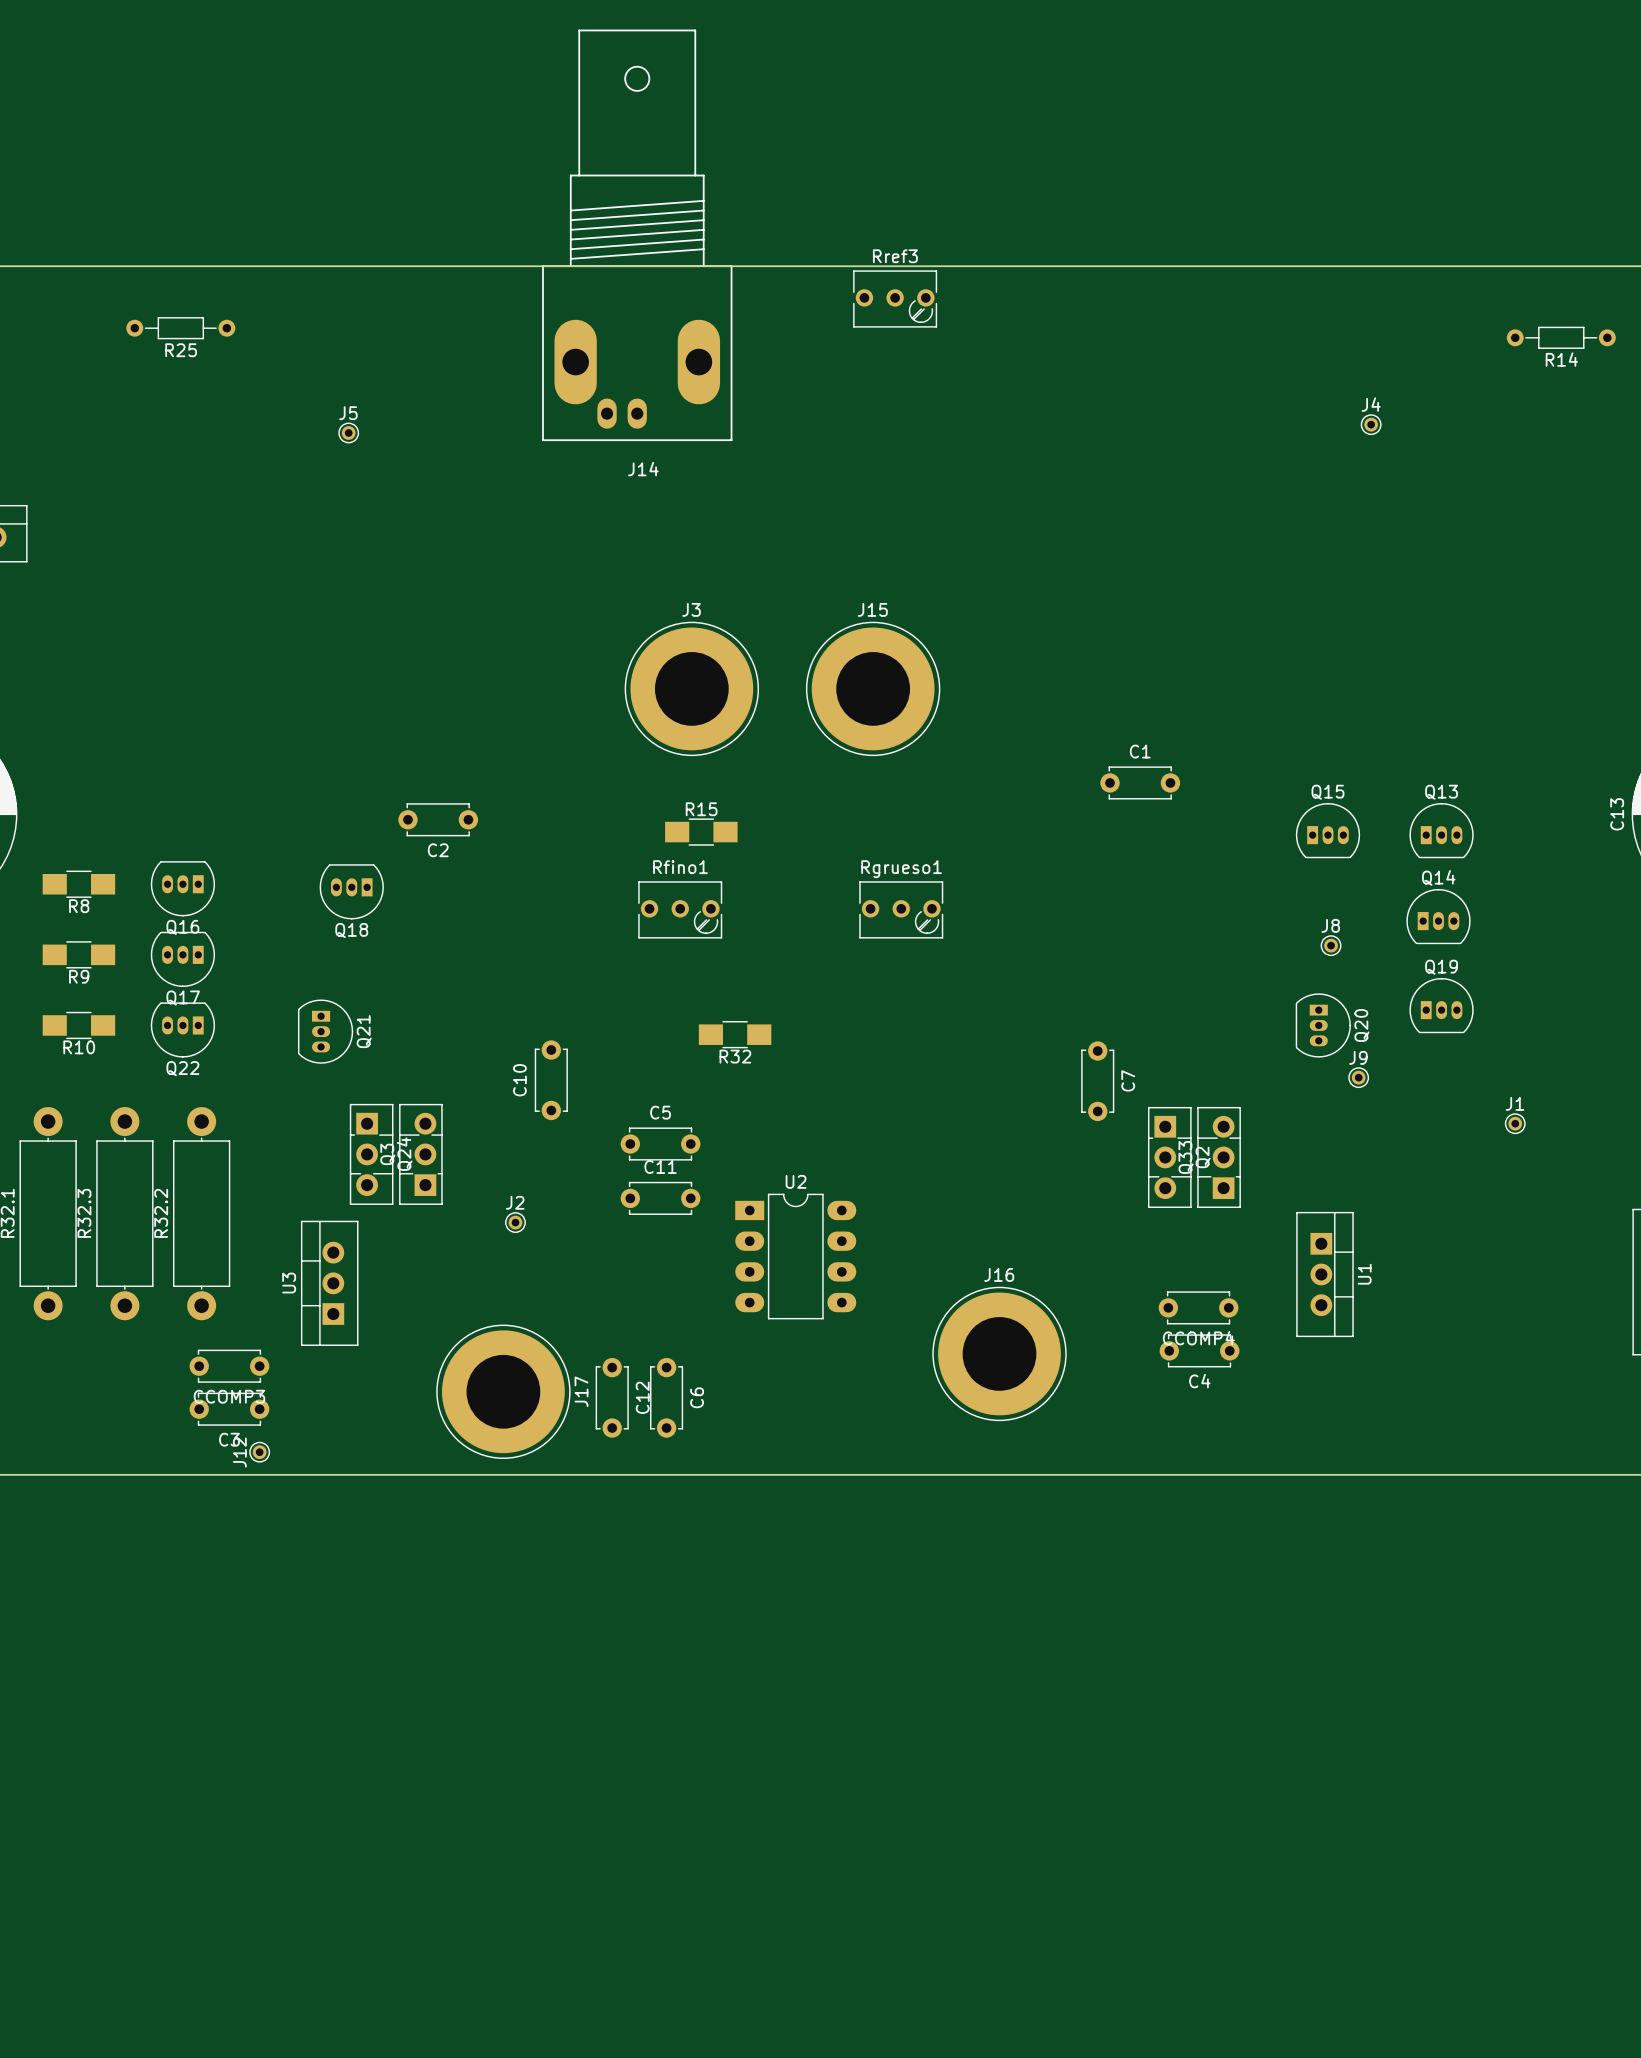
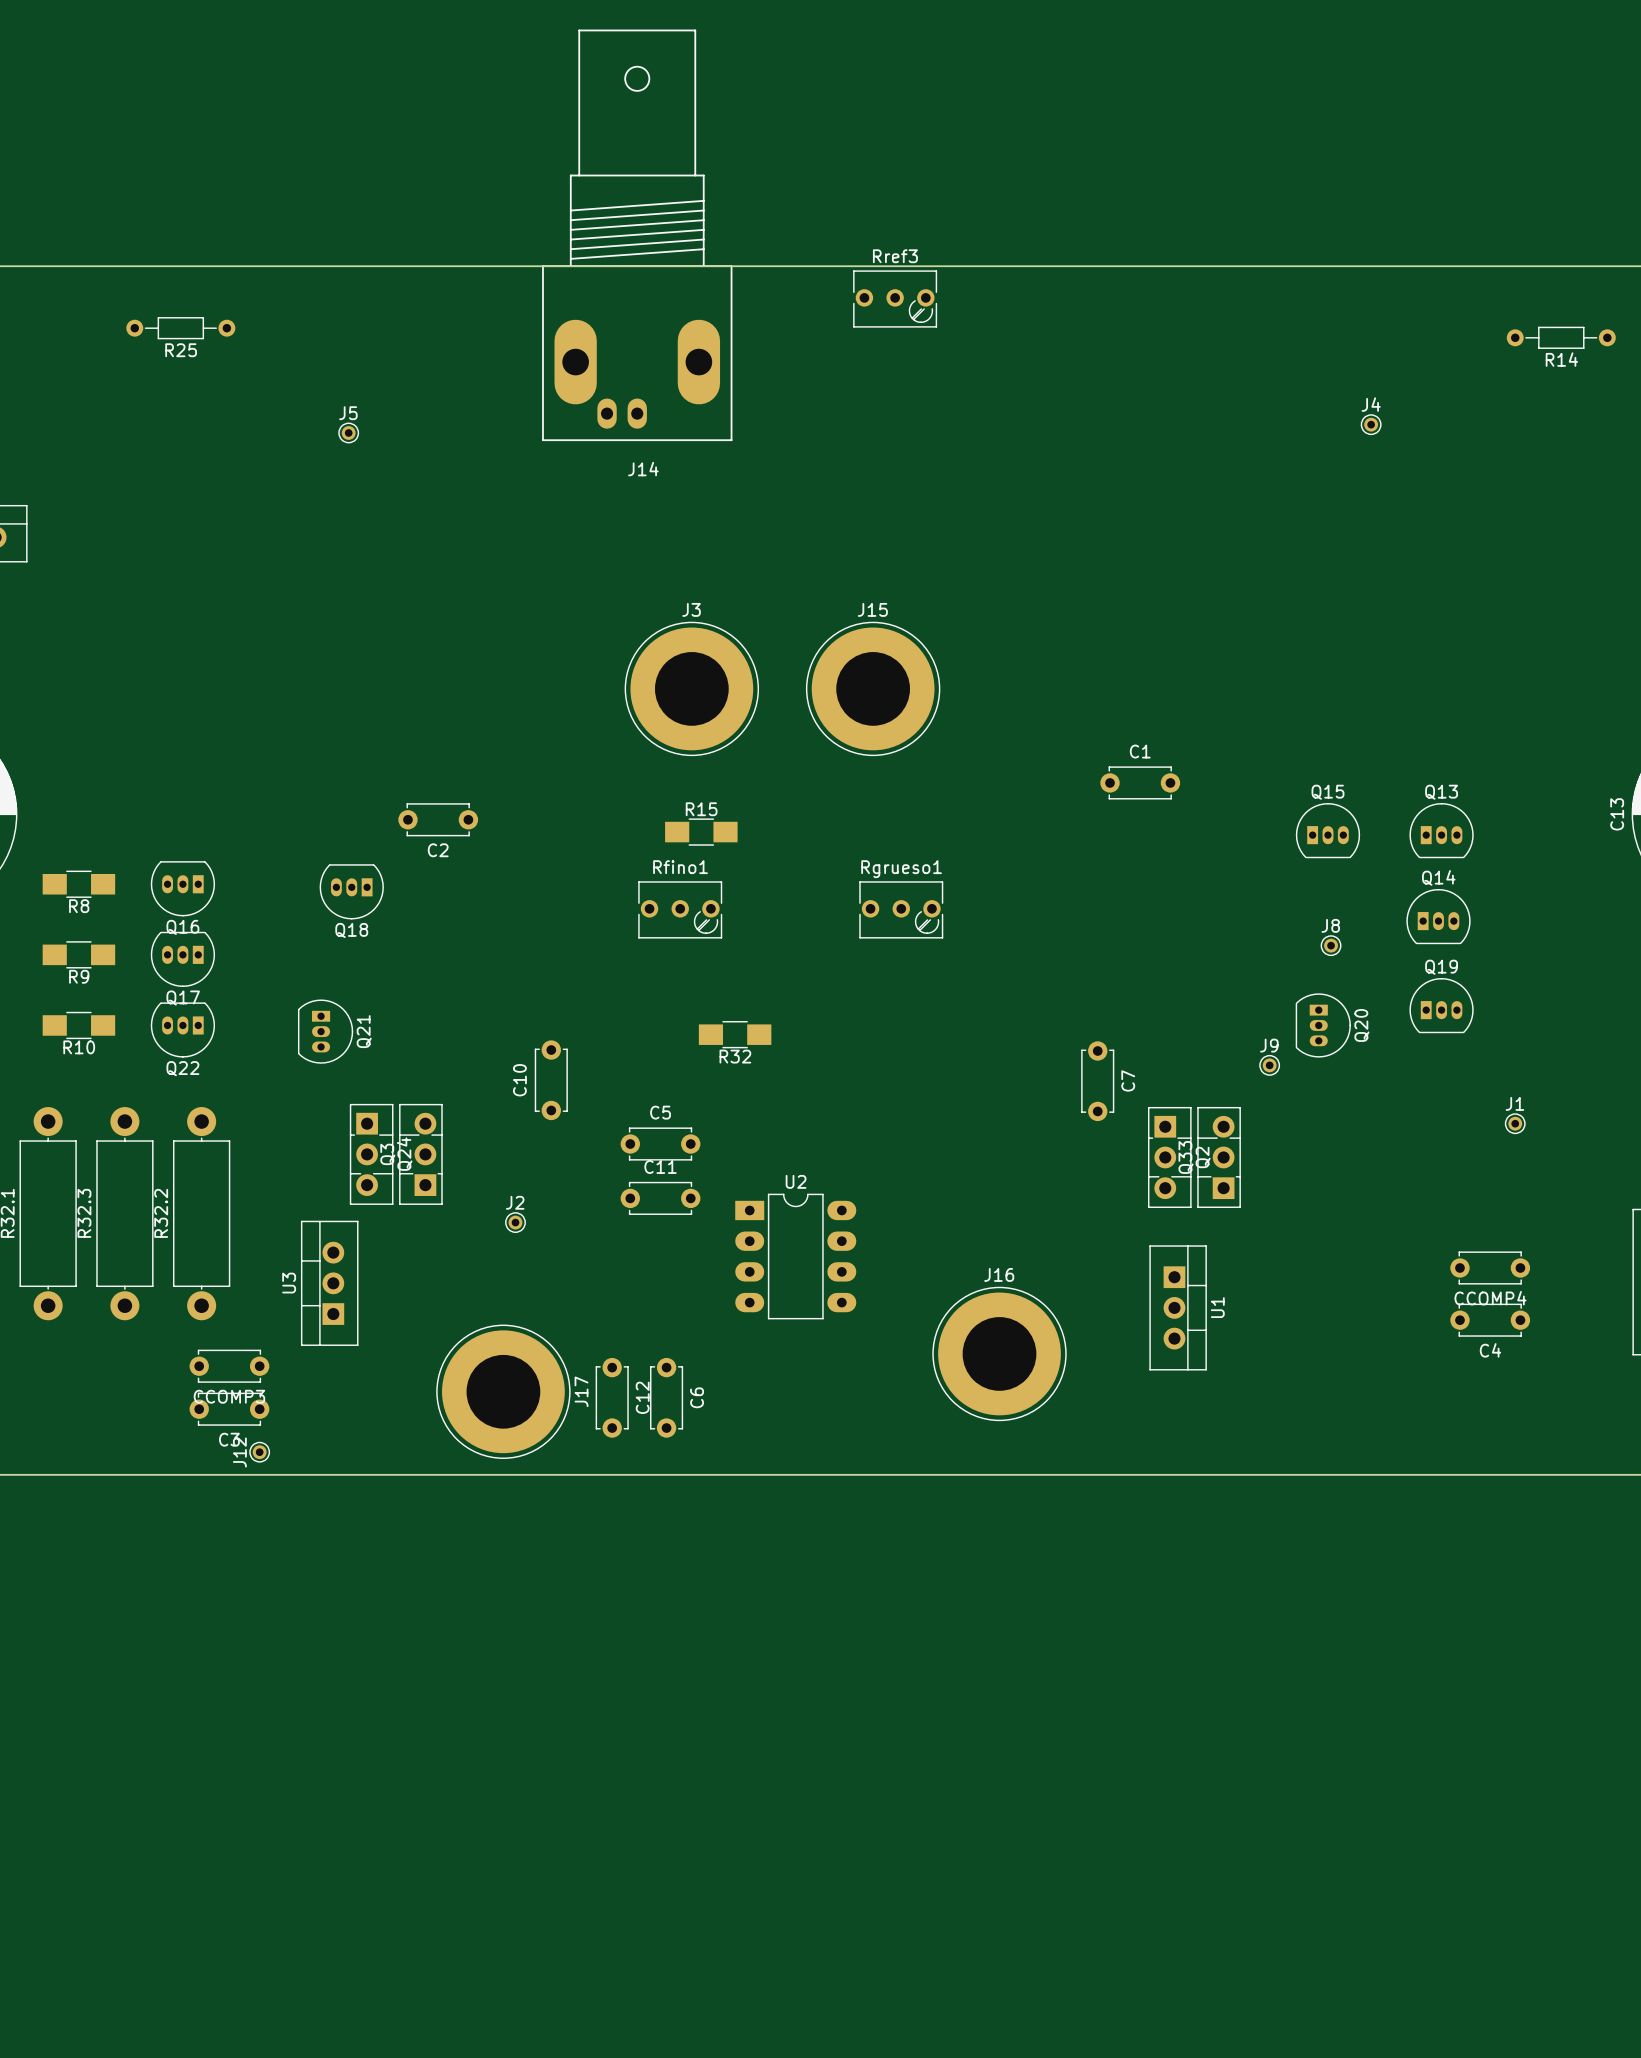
J9 position: (1358, 1077) -> (1269, 1065)
U1 position: (1324, 1274) -> (1178, 1307)
CCOMP4 position: (1198, 1307) -> (1490, 1267)
C4 position: (1199, 1350) -> (1490, 1320)

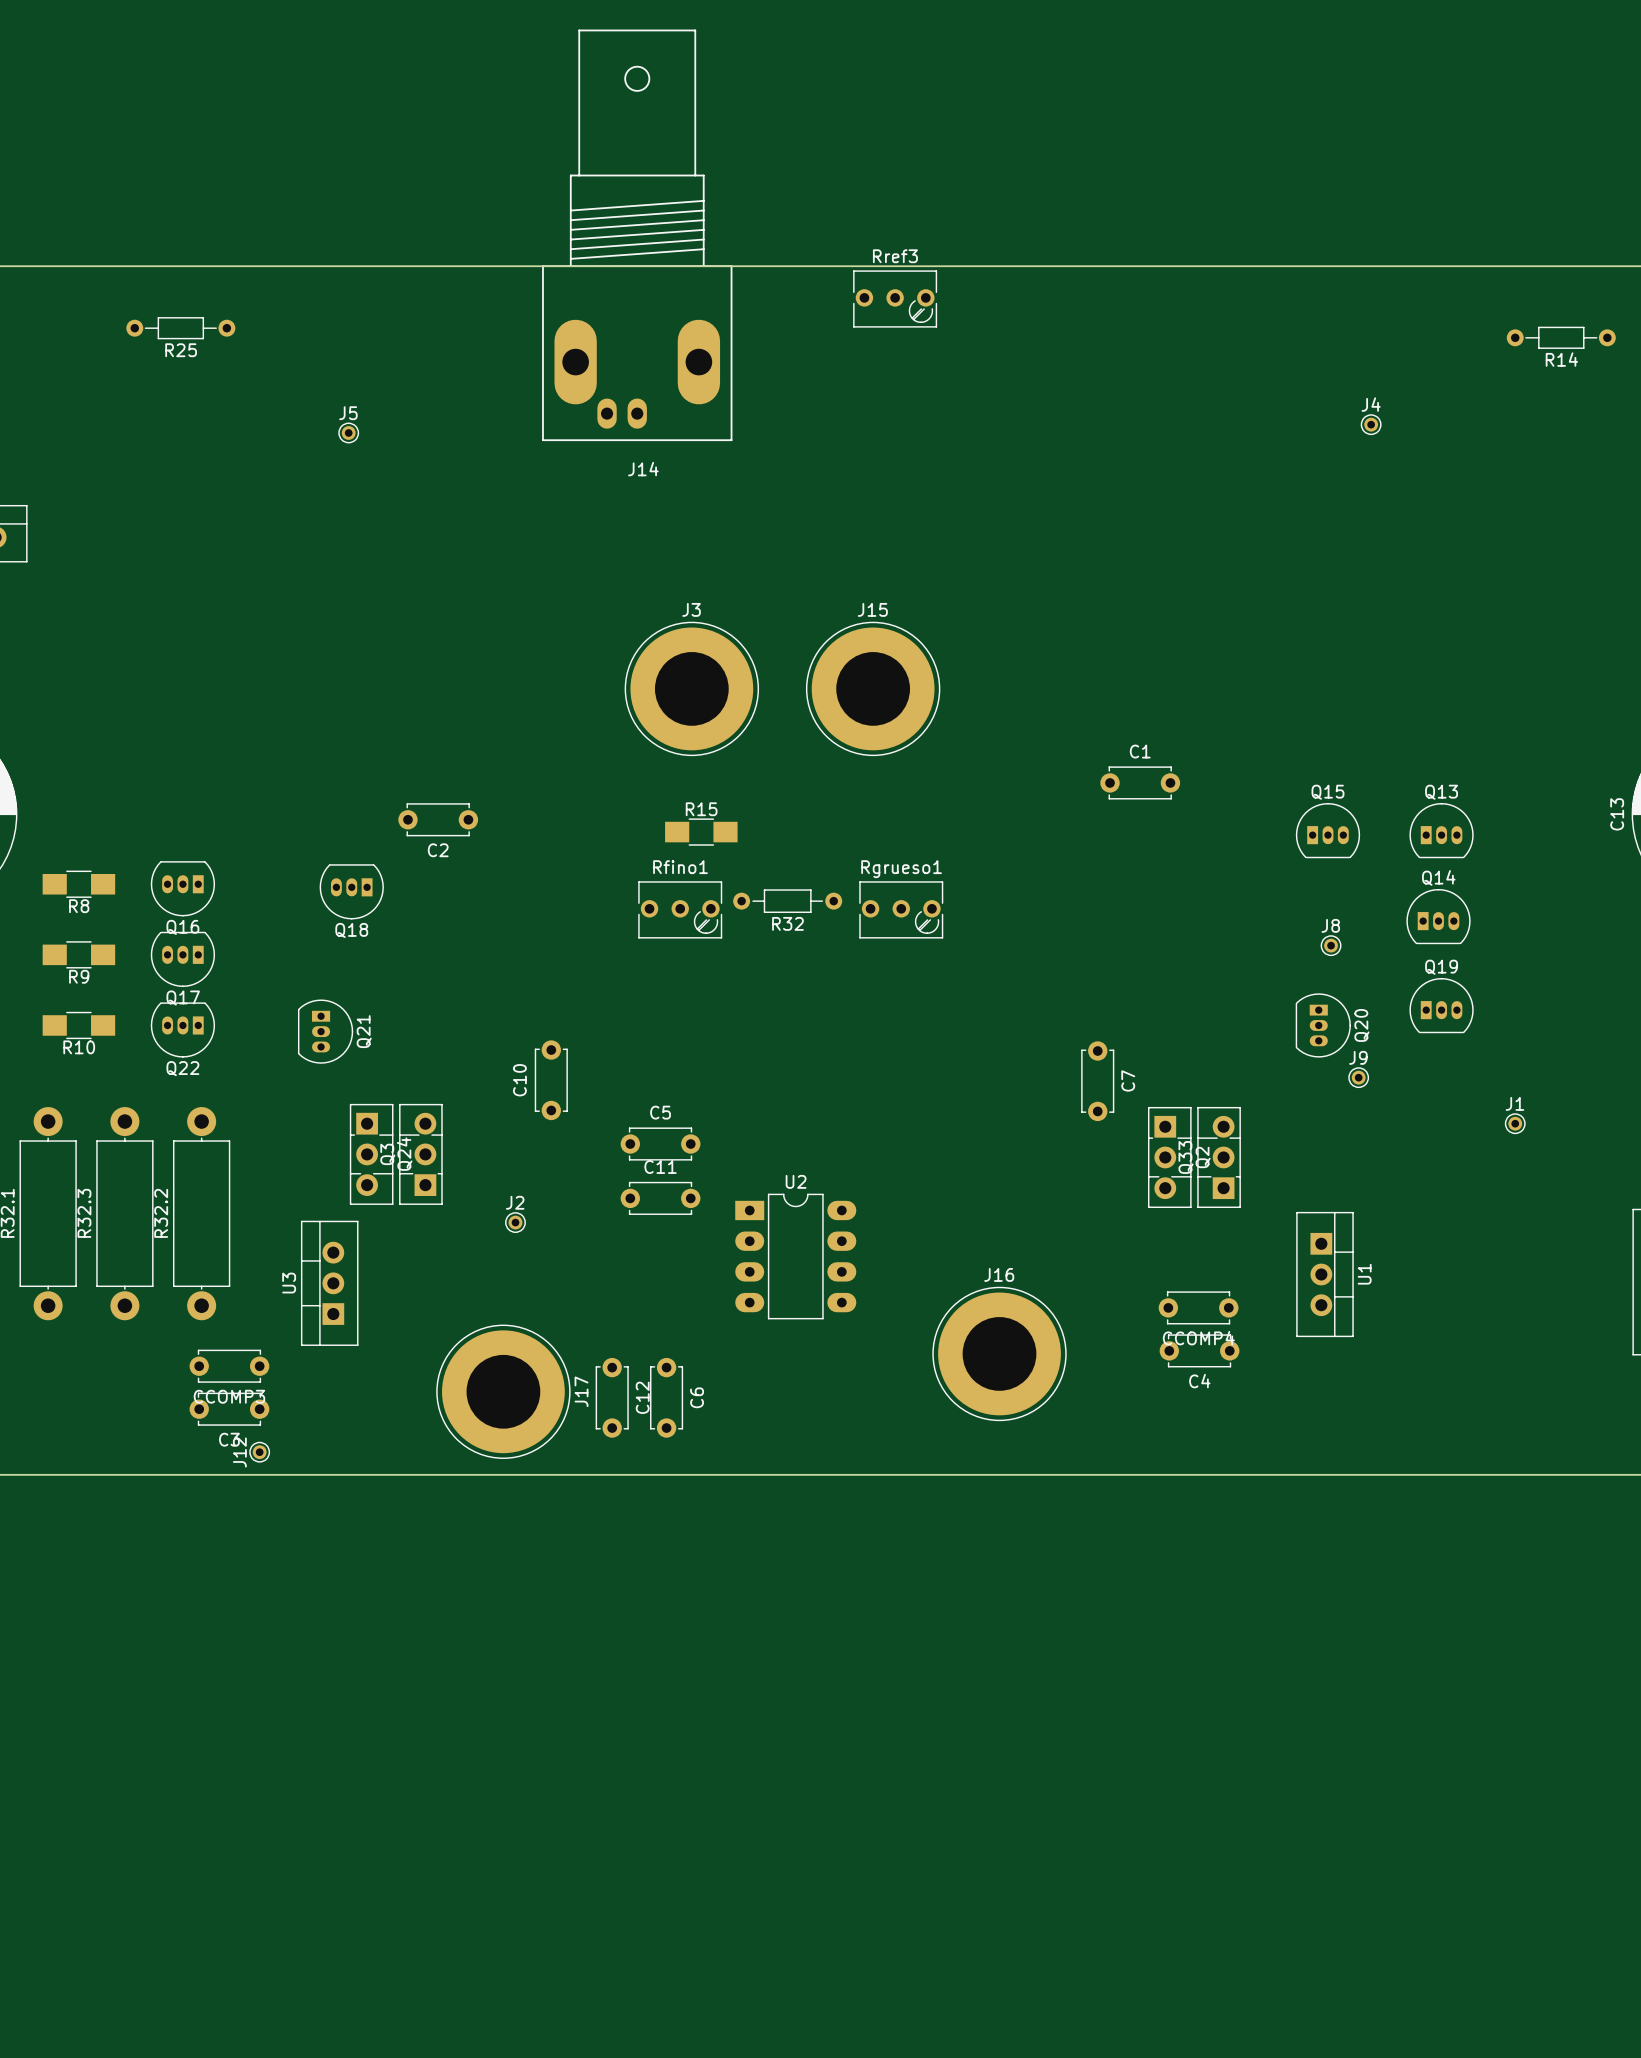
R32 footprint: [698, 1021, 772, 1049] -> [733, 889, 843, 913]
J9 position: (1269, 1065) -> (1358, 1077)
CCOMP4 position: (1490, 1267) -> (1198, 1307)
U1 position: (1178, 1307) -> (1324, 1274)
C4 position: (1490, 1320) -> (1199, 1350)

